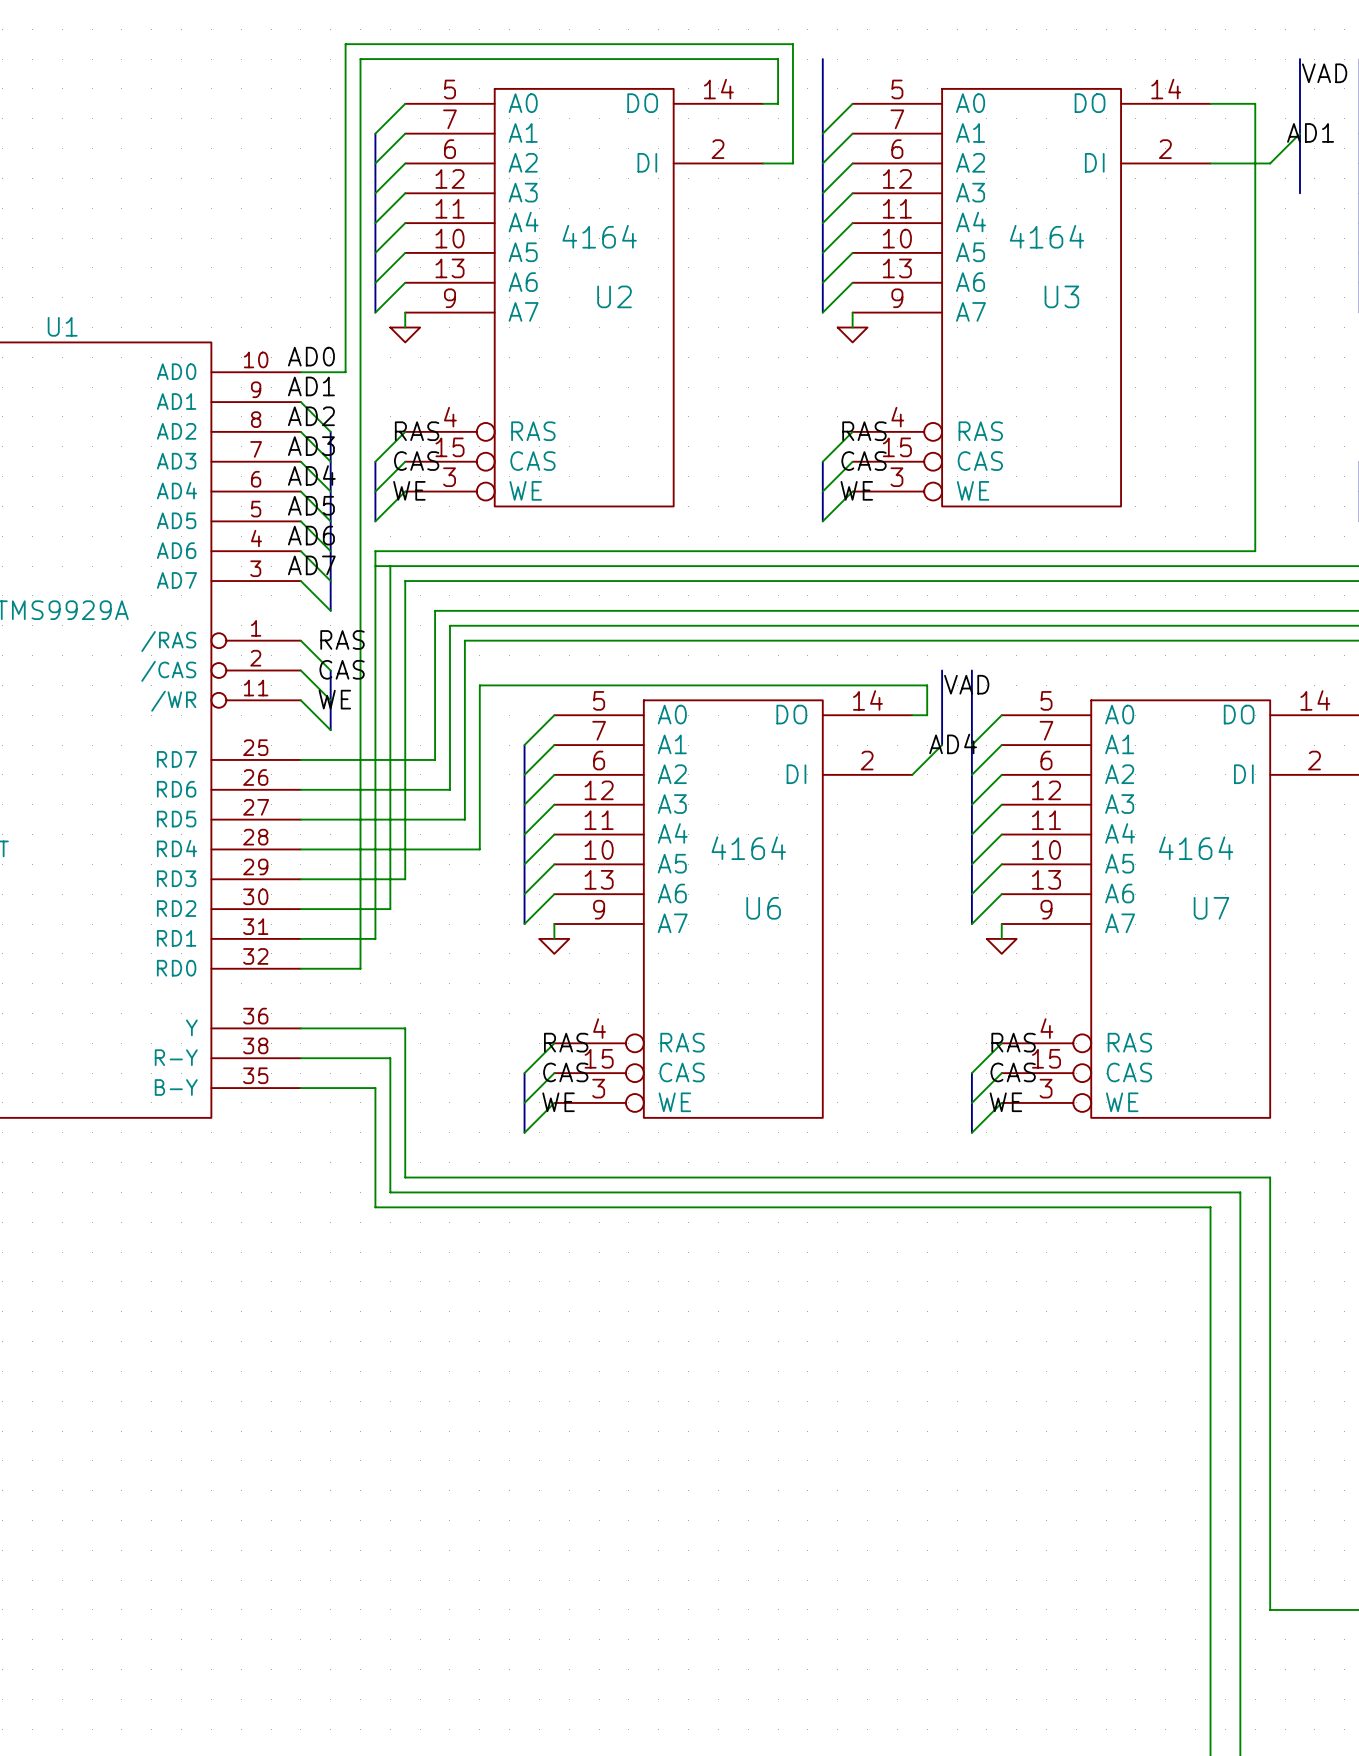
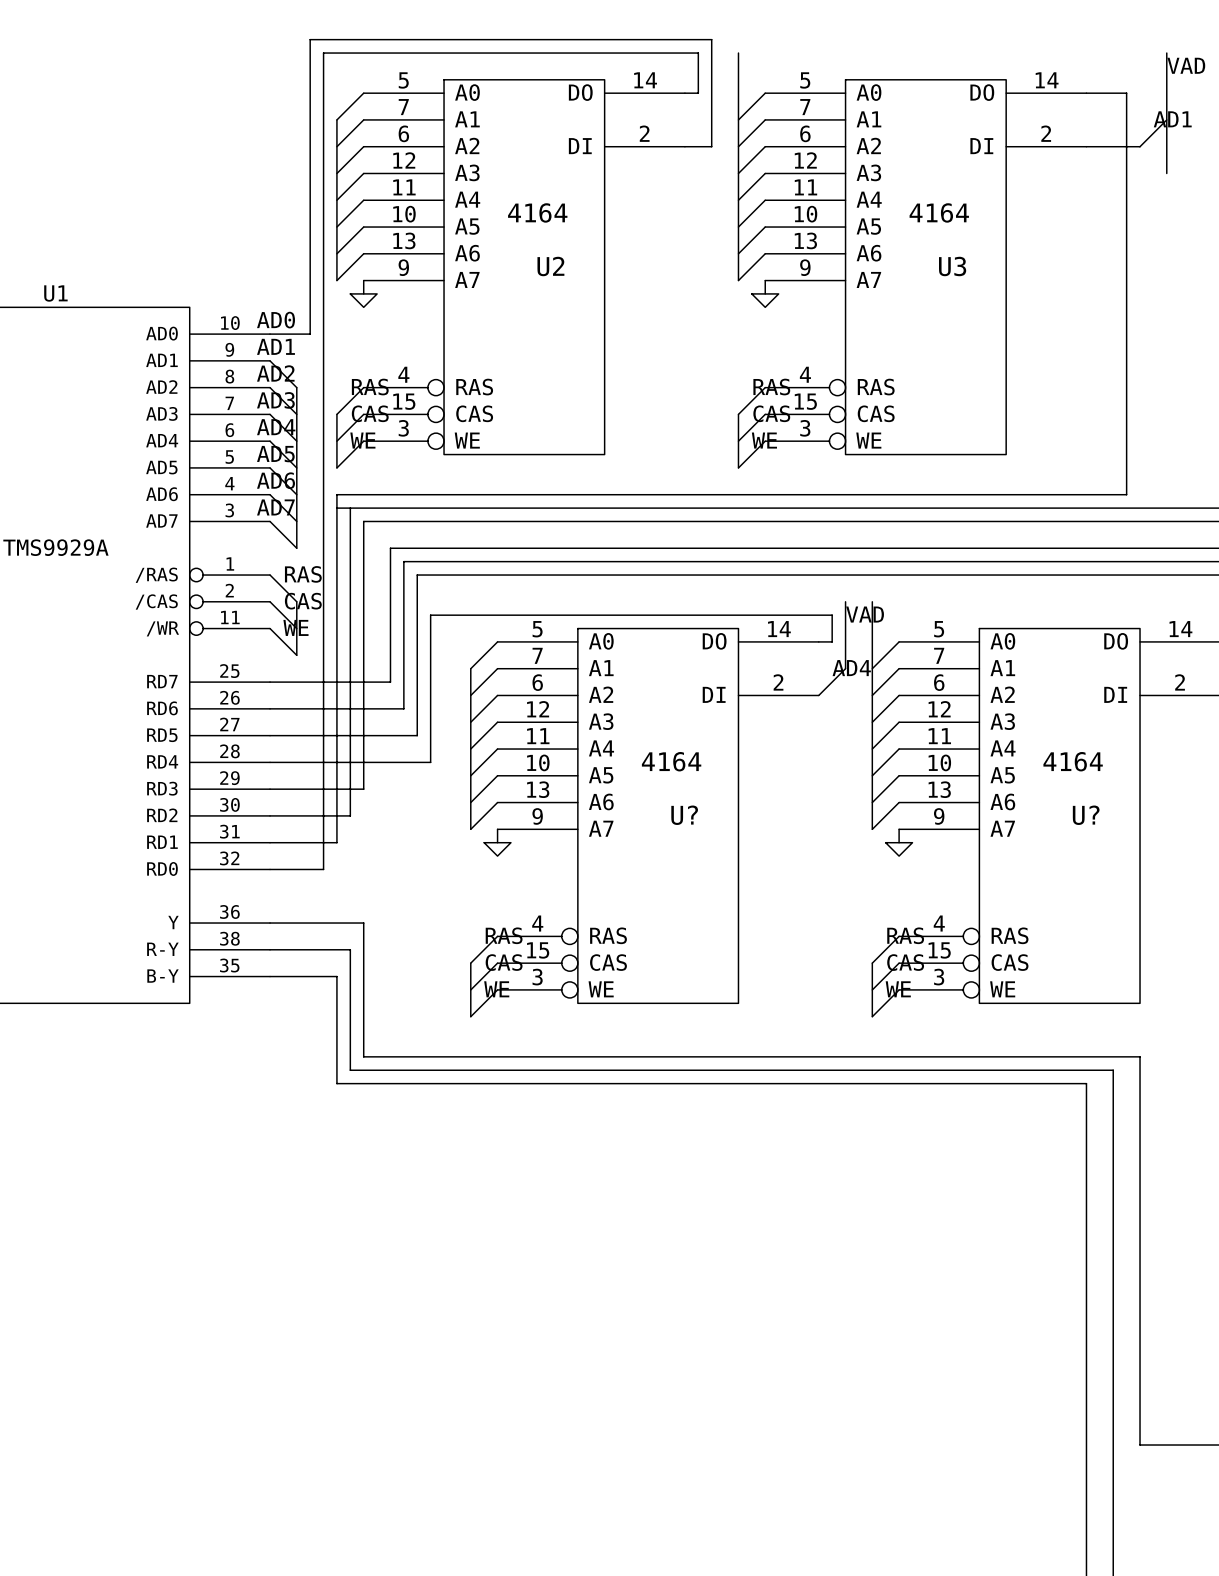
U6 name: U6 (763, 908) -> U? (684, 815)
U7 name: U7 (1211, 908) -> U? (1086, 815)

